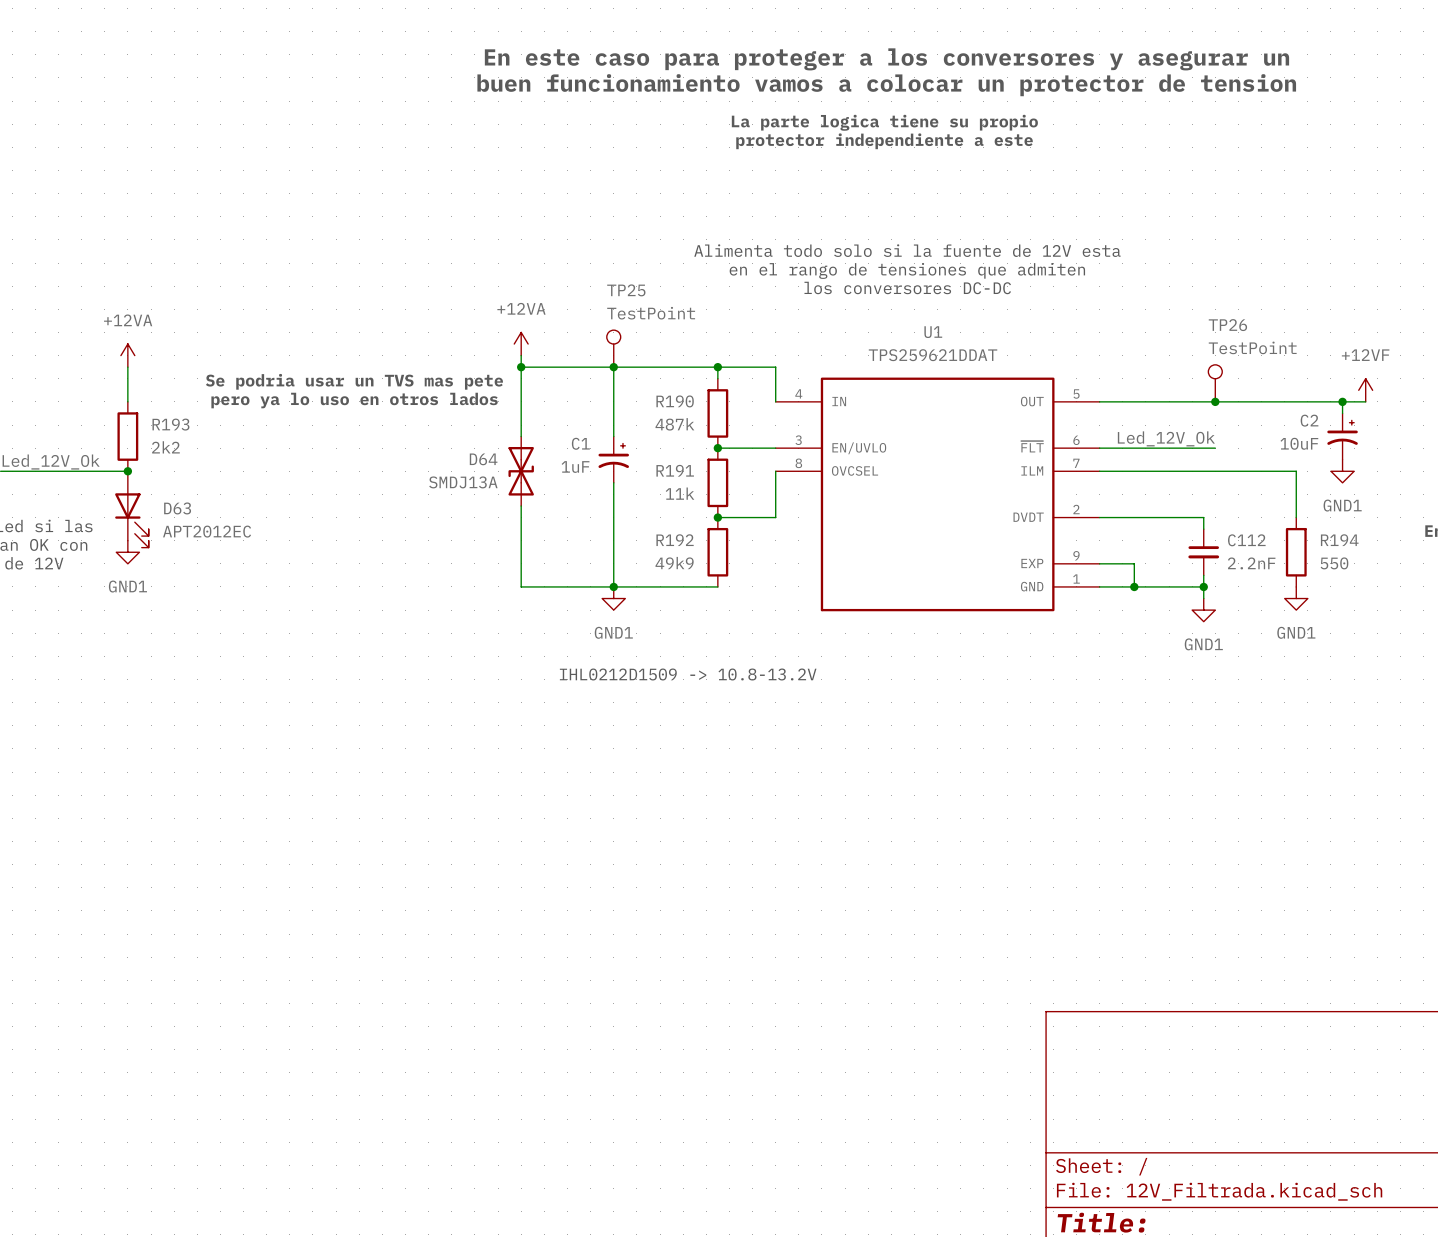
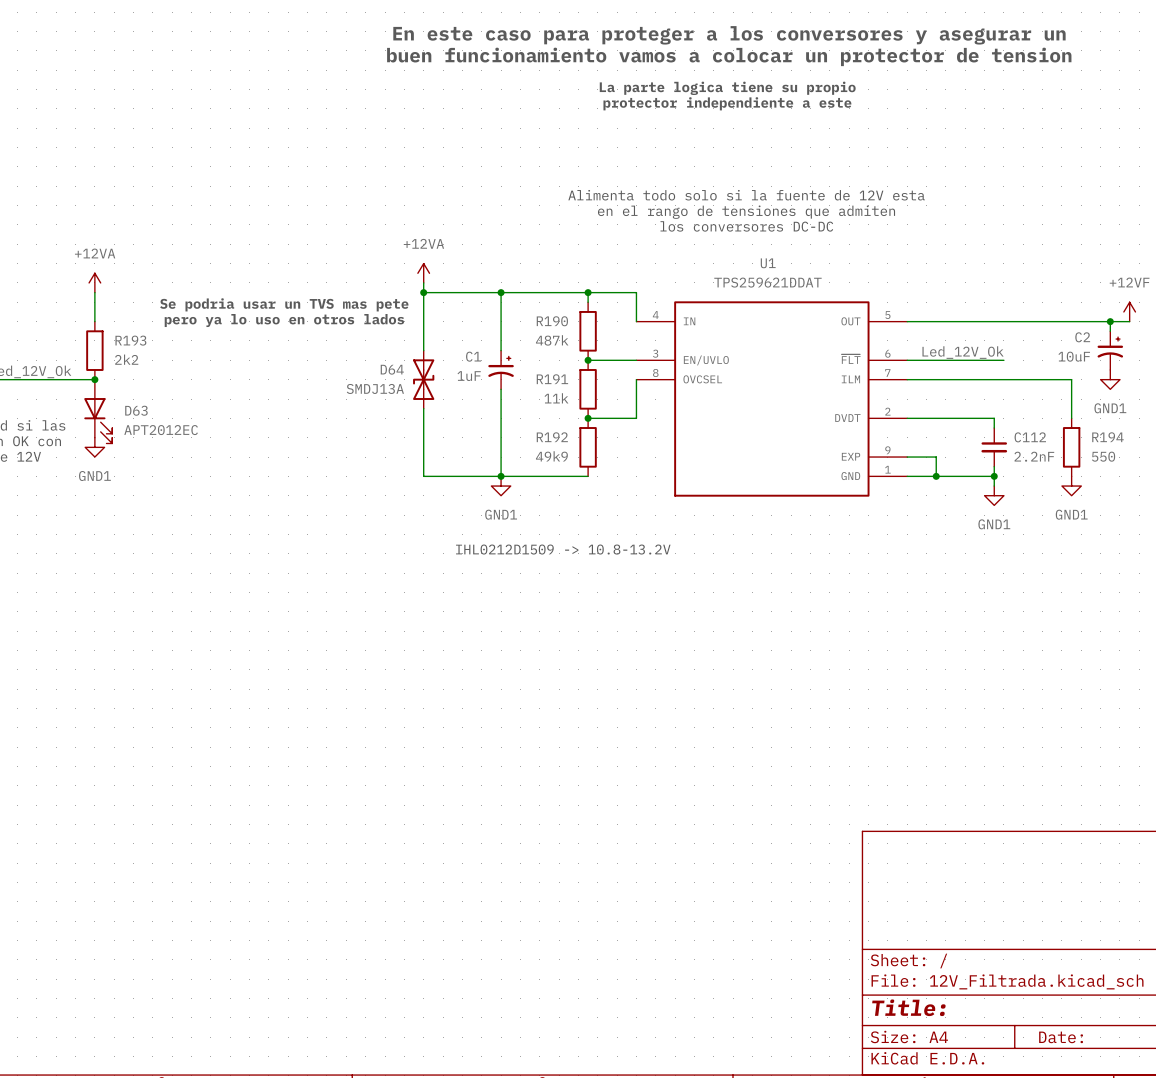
TP25: TestPoint (613, 348) -> none
TP26: TestPoint (1215, 383) -> none
junction: (1215, 401) -> none

